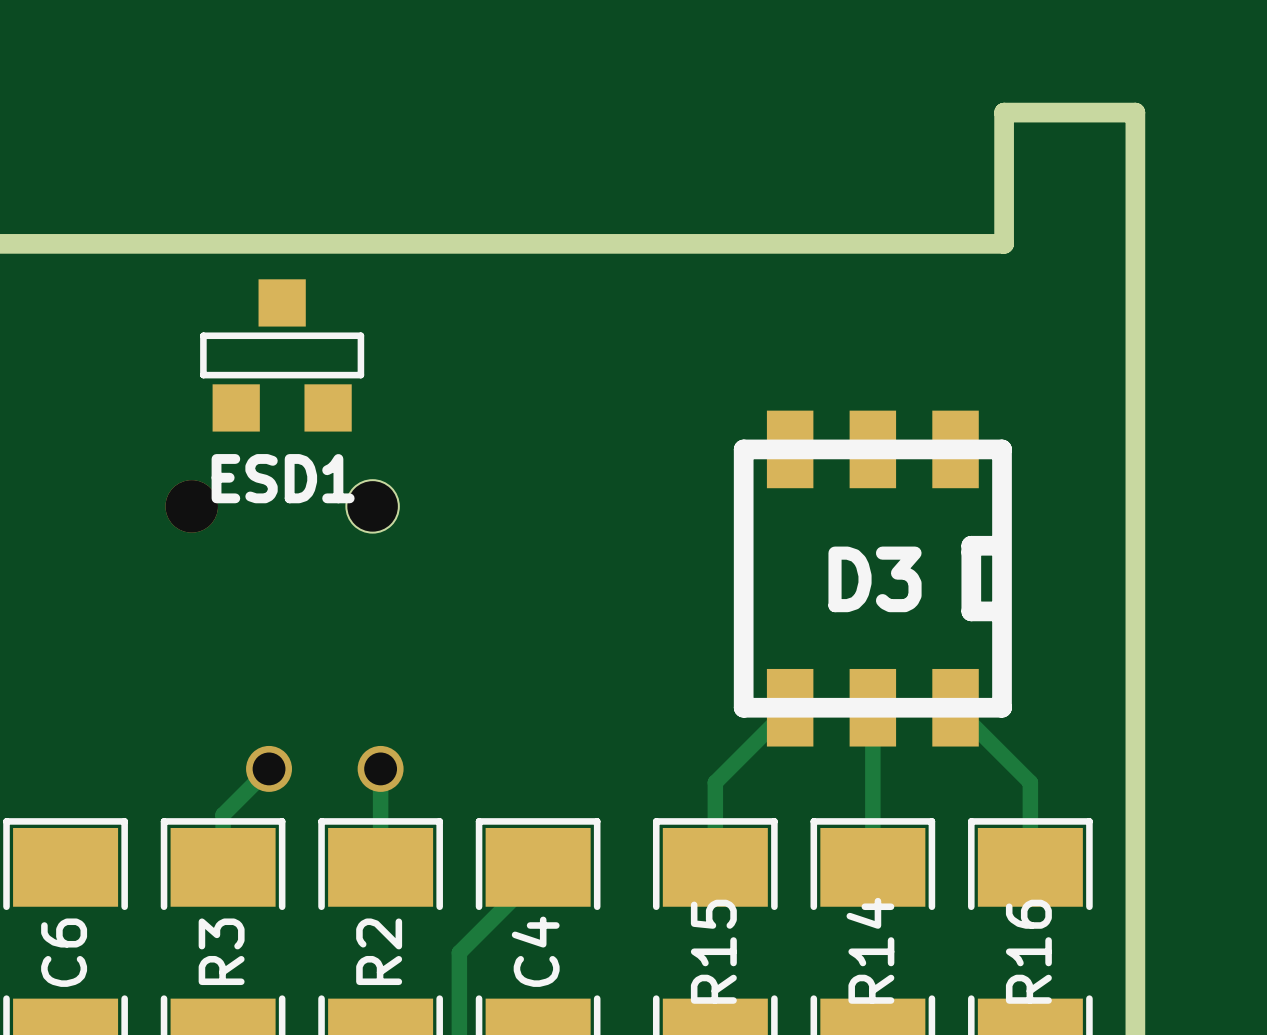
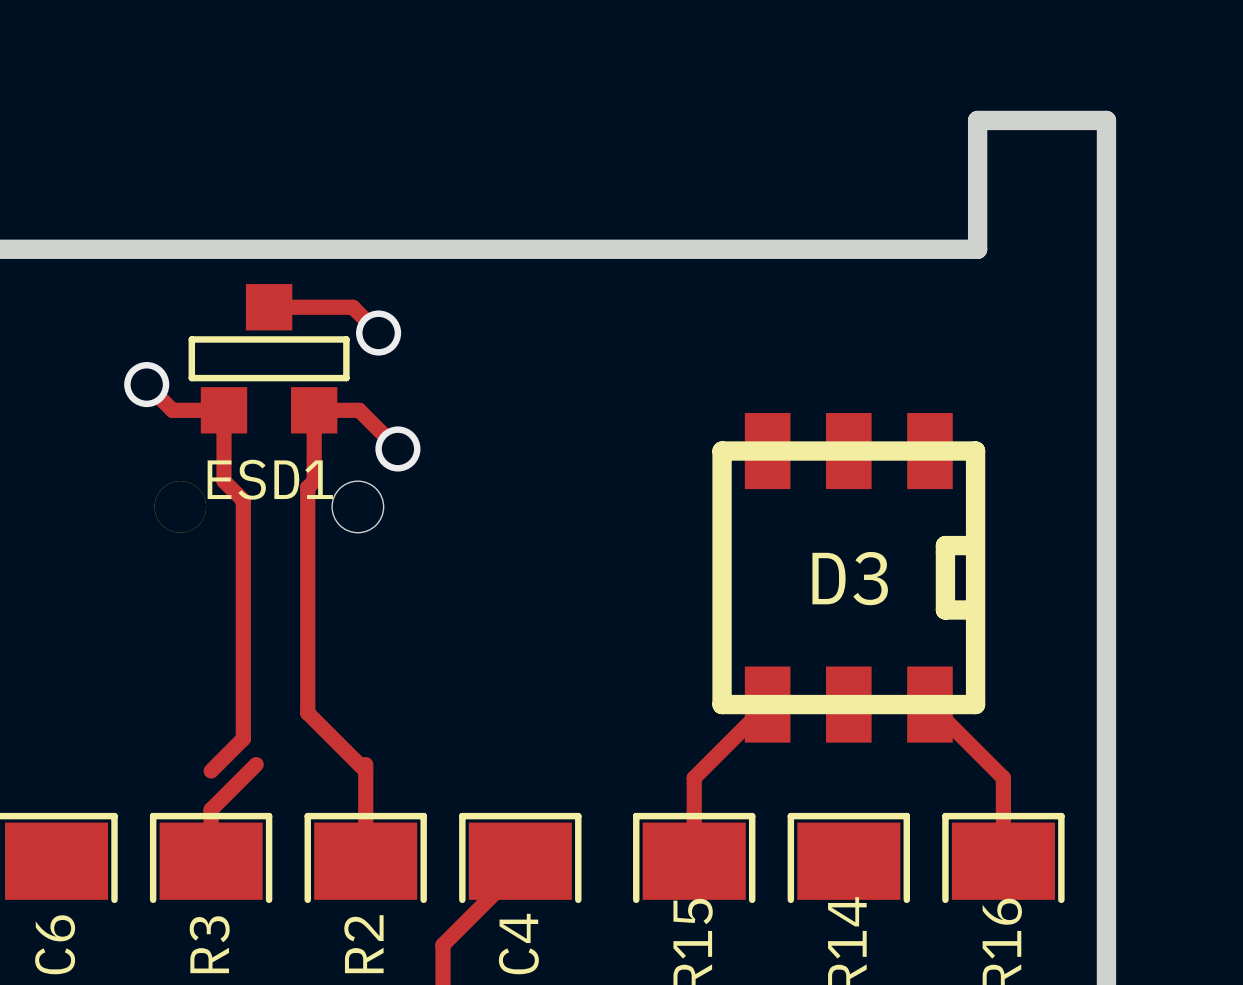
track: none -> (269, 307) (352, 307) (378, 333)
via: none -> (378, 333)
track: none -> (146, 384) (172, 410) (224, 410) (224, 481) (243, 500) (243, 738) (211, 771)
via: none -> (146, 384)
track: none -> (397, 448) (359, 410) (314, 410) (314, 481) (307, 487) (307, 713) (365, 771)
via: none -> (397, 448)
track: (872, 707) (872, 867) -> none
via: (269, 768) -> none
via: (380, 768) -> none

